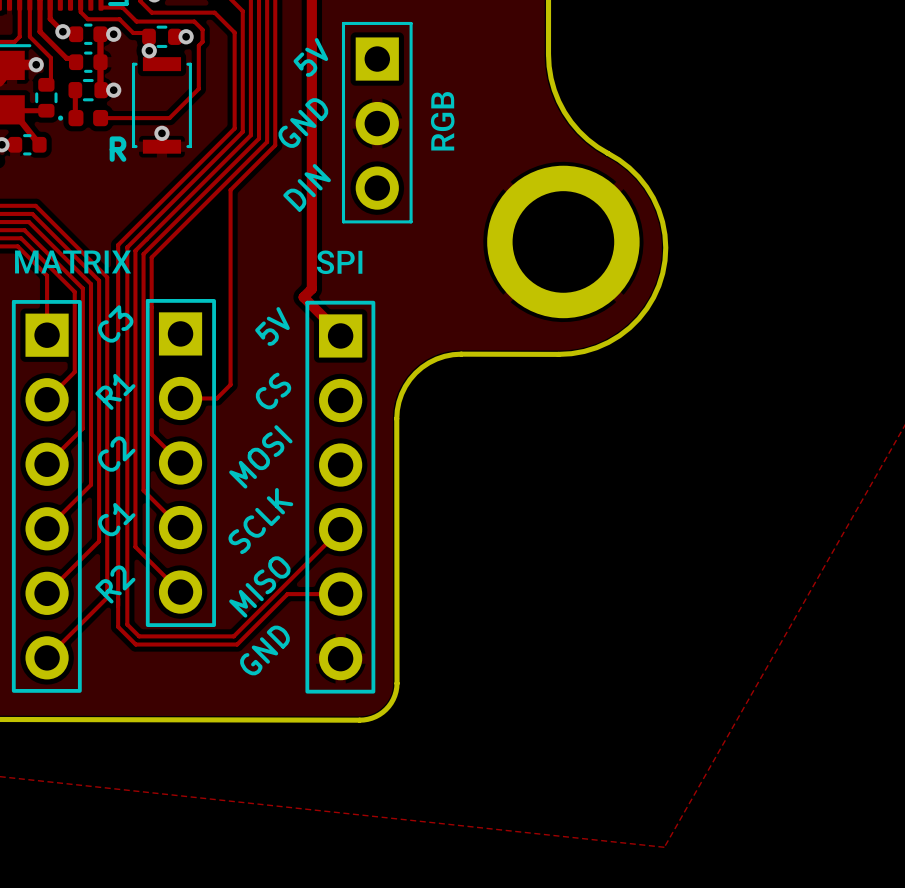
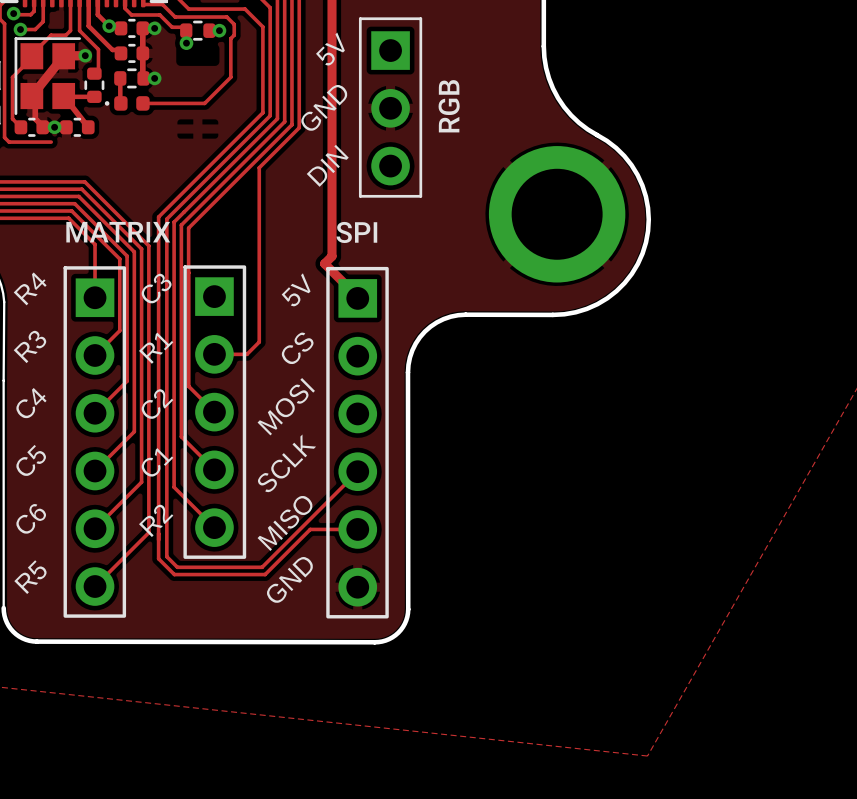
part: (161, 105) -> none
via: (161, 133) -> none

